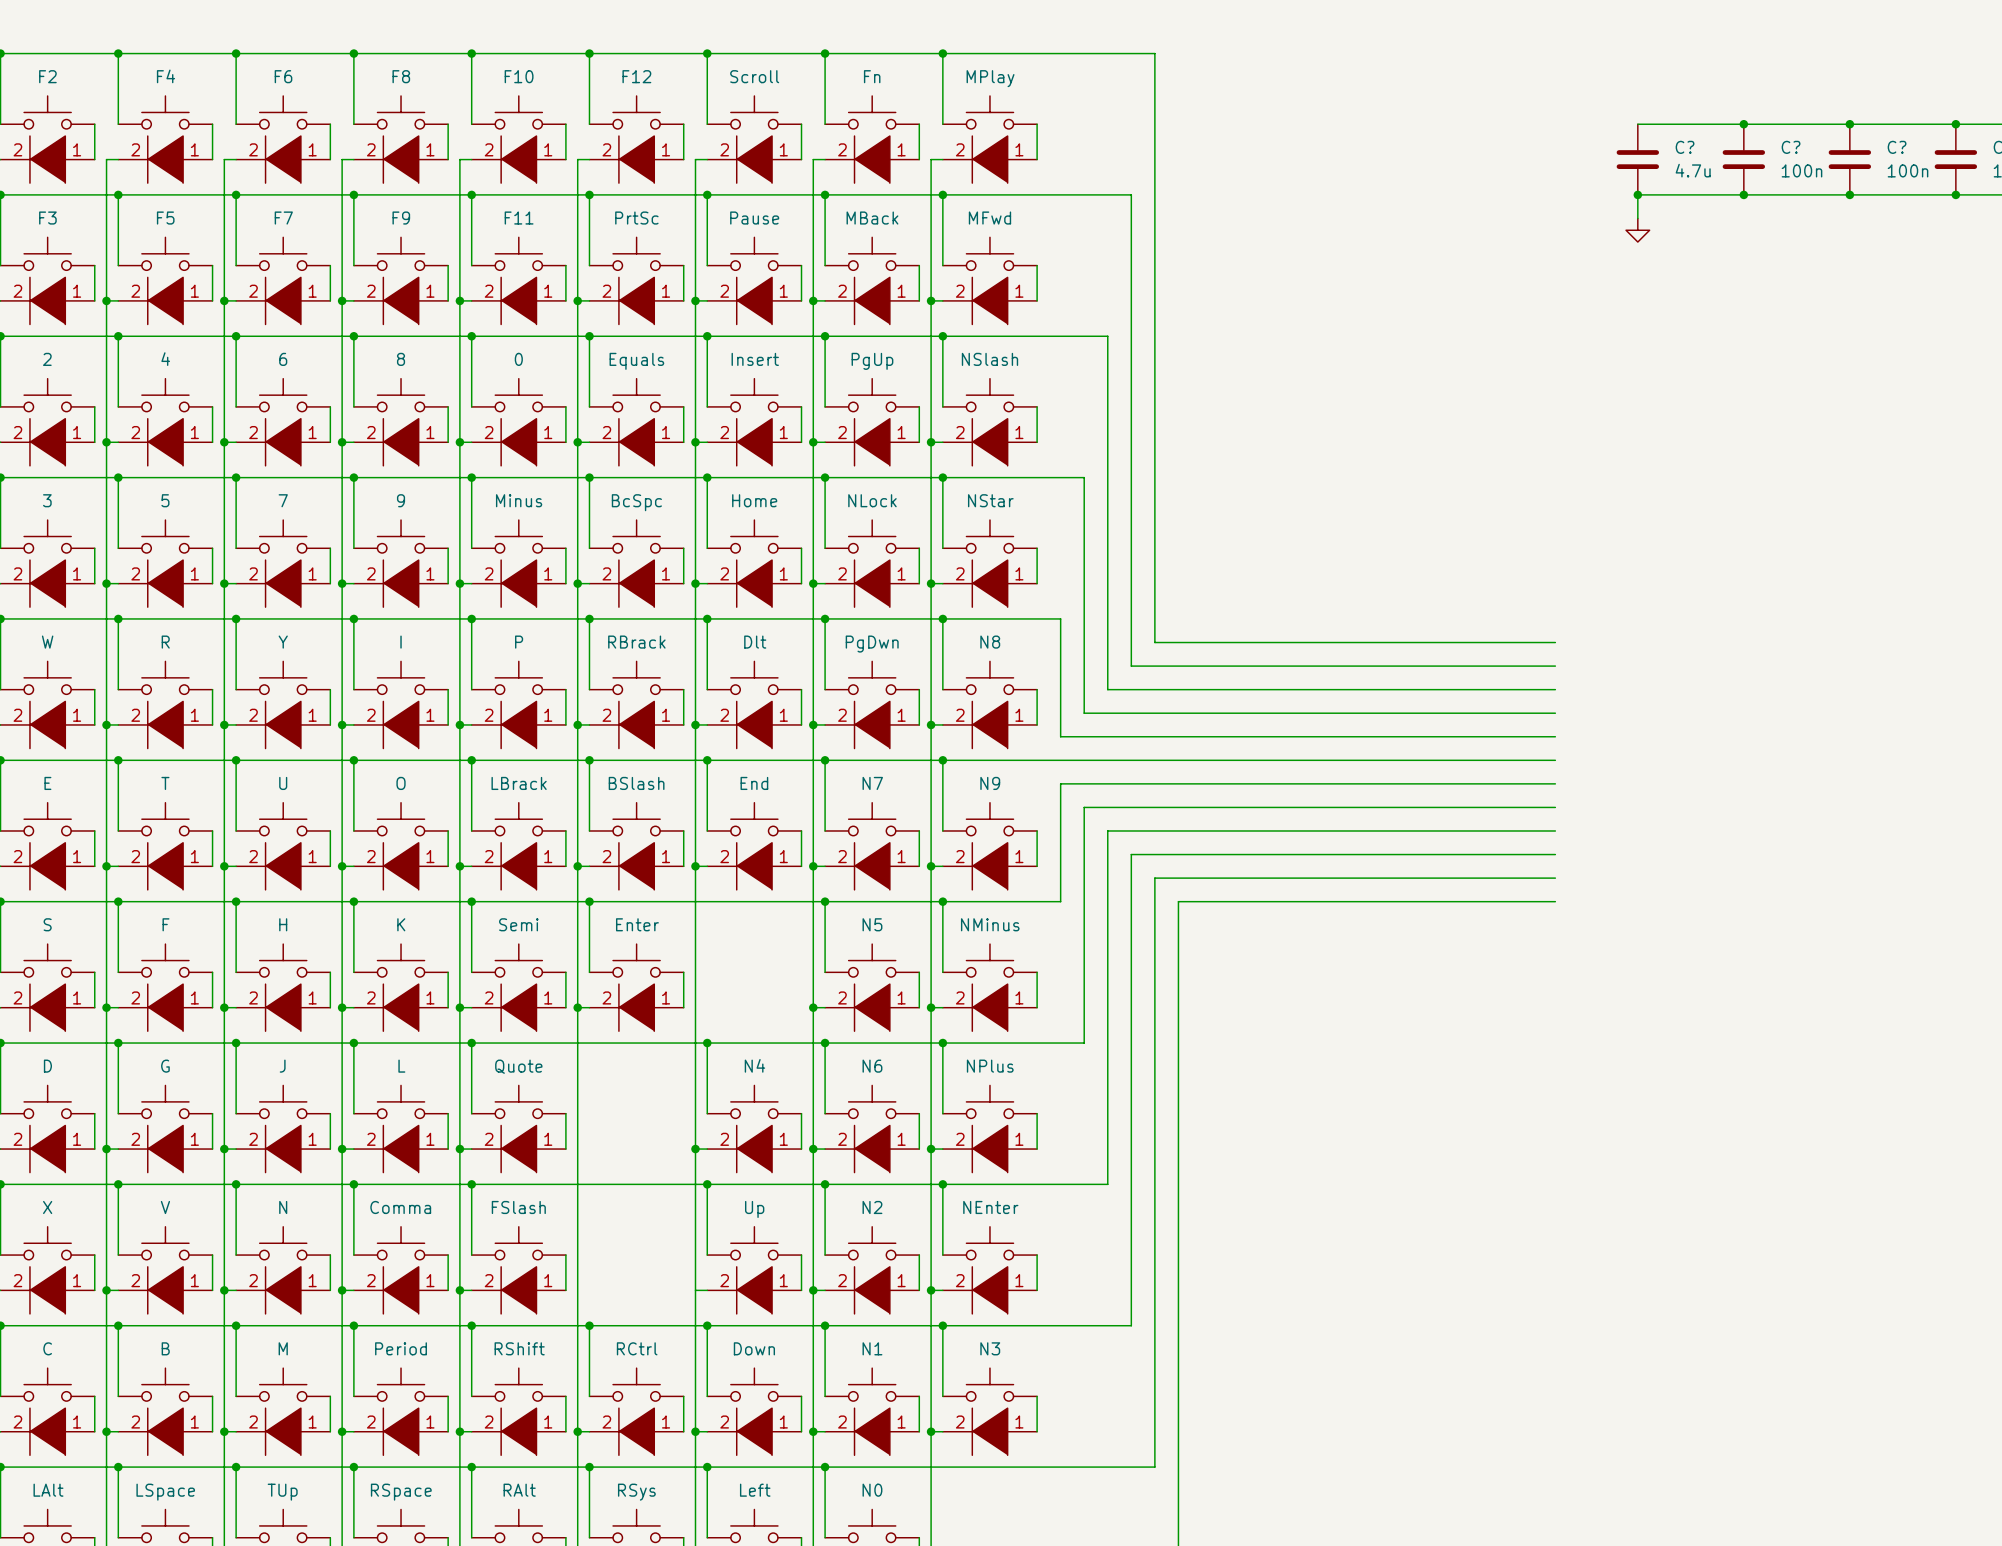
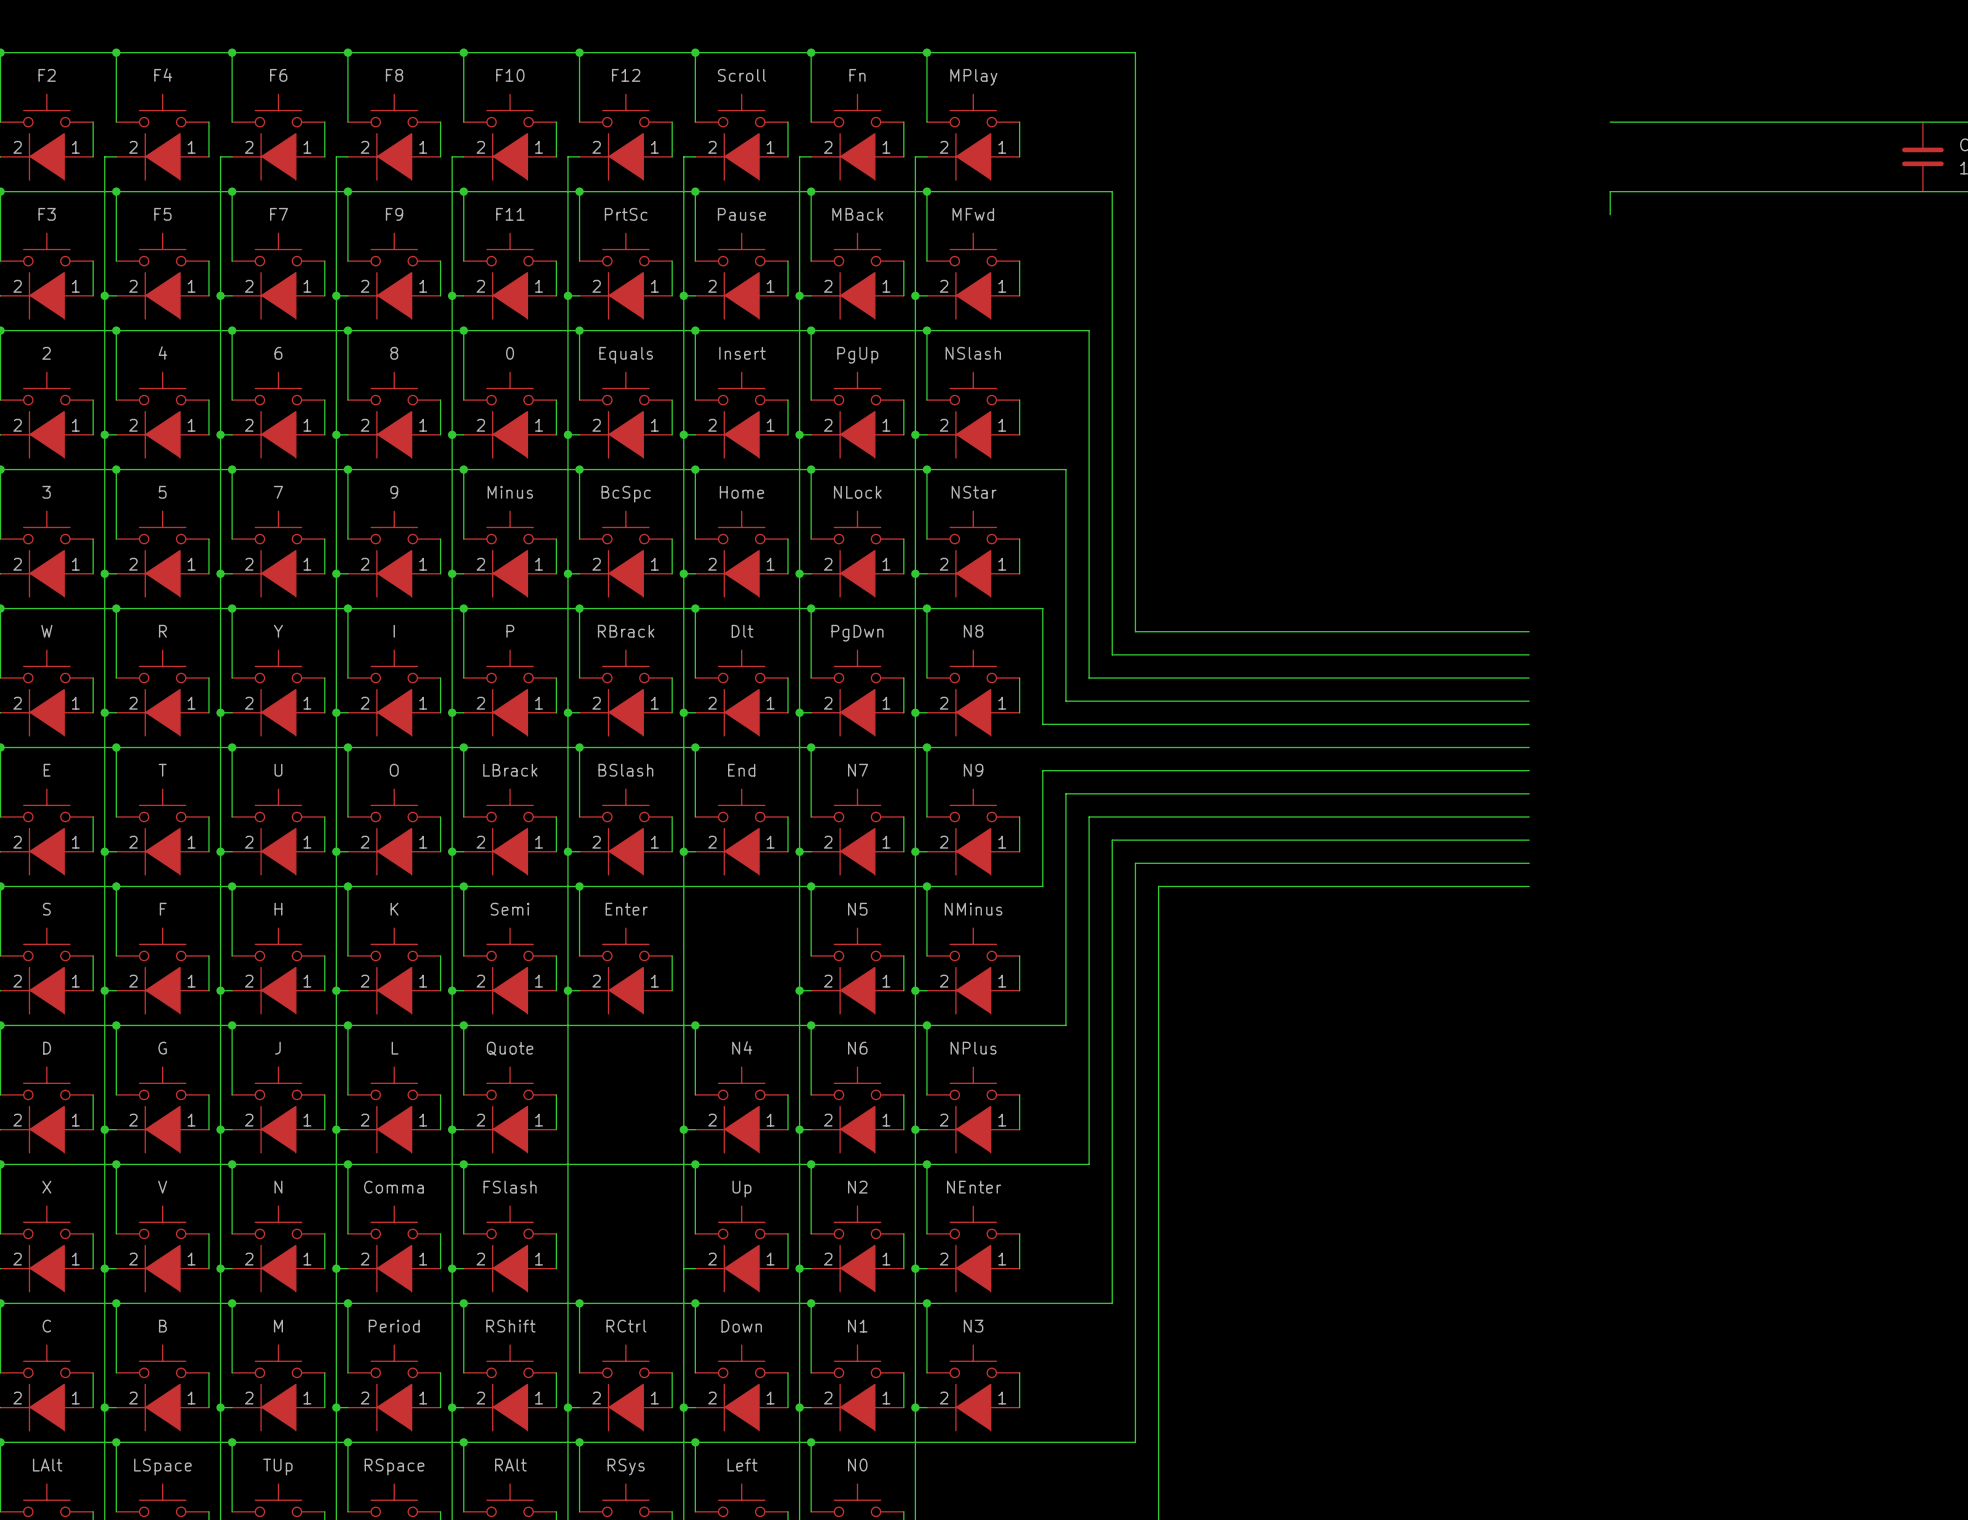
junction: (1743, 124) -> none
junction: (1849, 124) -> none
junction: (1955, 124) -> none
C?: 4.7u (1637, 159) -> none
C?: 100n (1743, 159) -> none
C?: 100n (1849, 159) -> none
junction: (1637, 194) -> none
junction: (1743, 194) -> none
junction: (1849, 194) -> none
junction: (1955, 194) -> none
power symbol: (1637, 230) -> none

